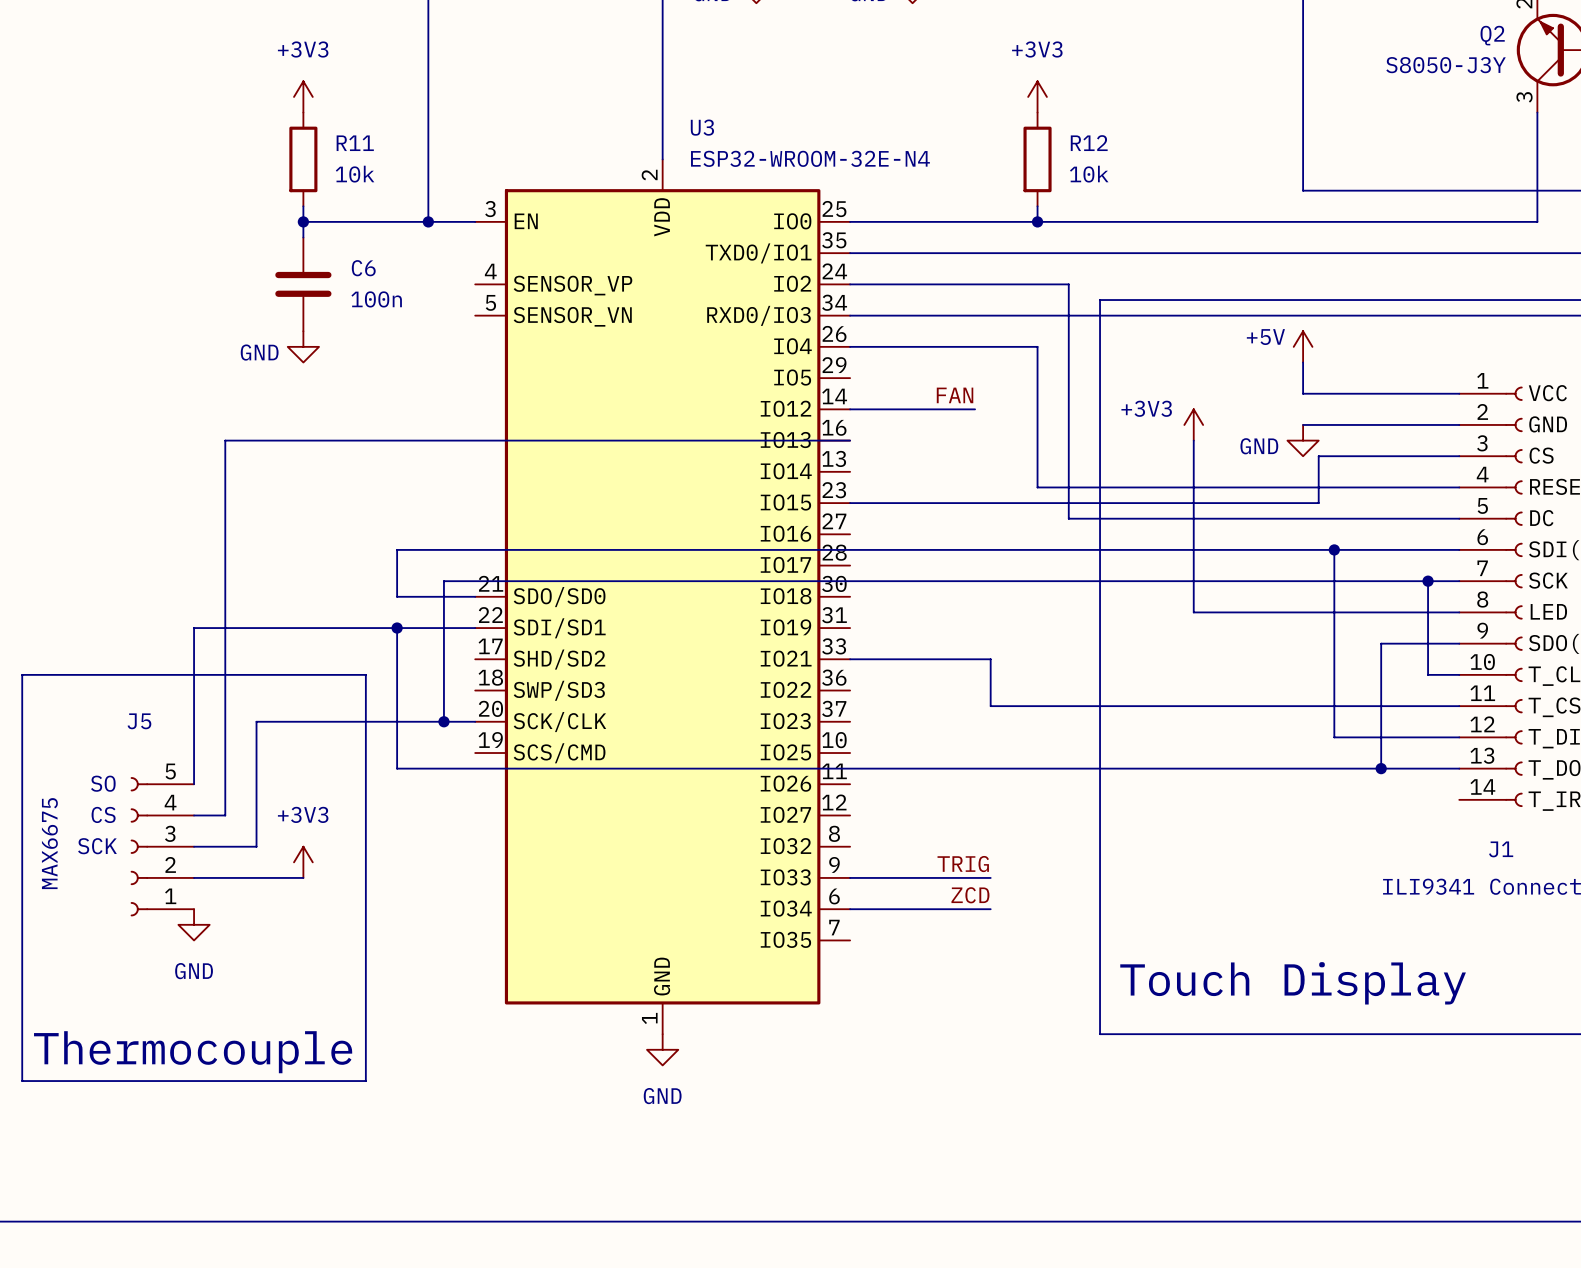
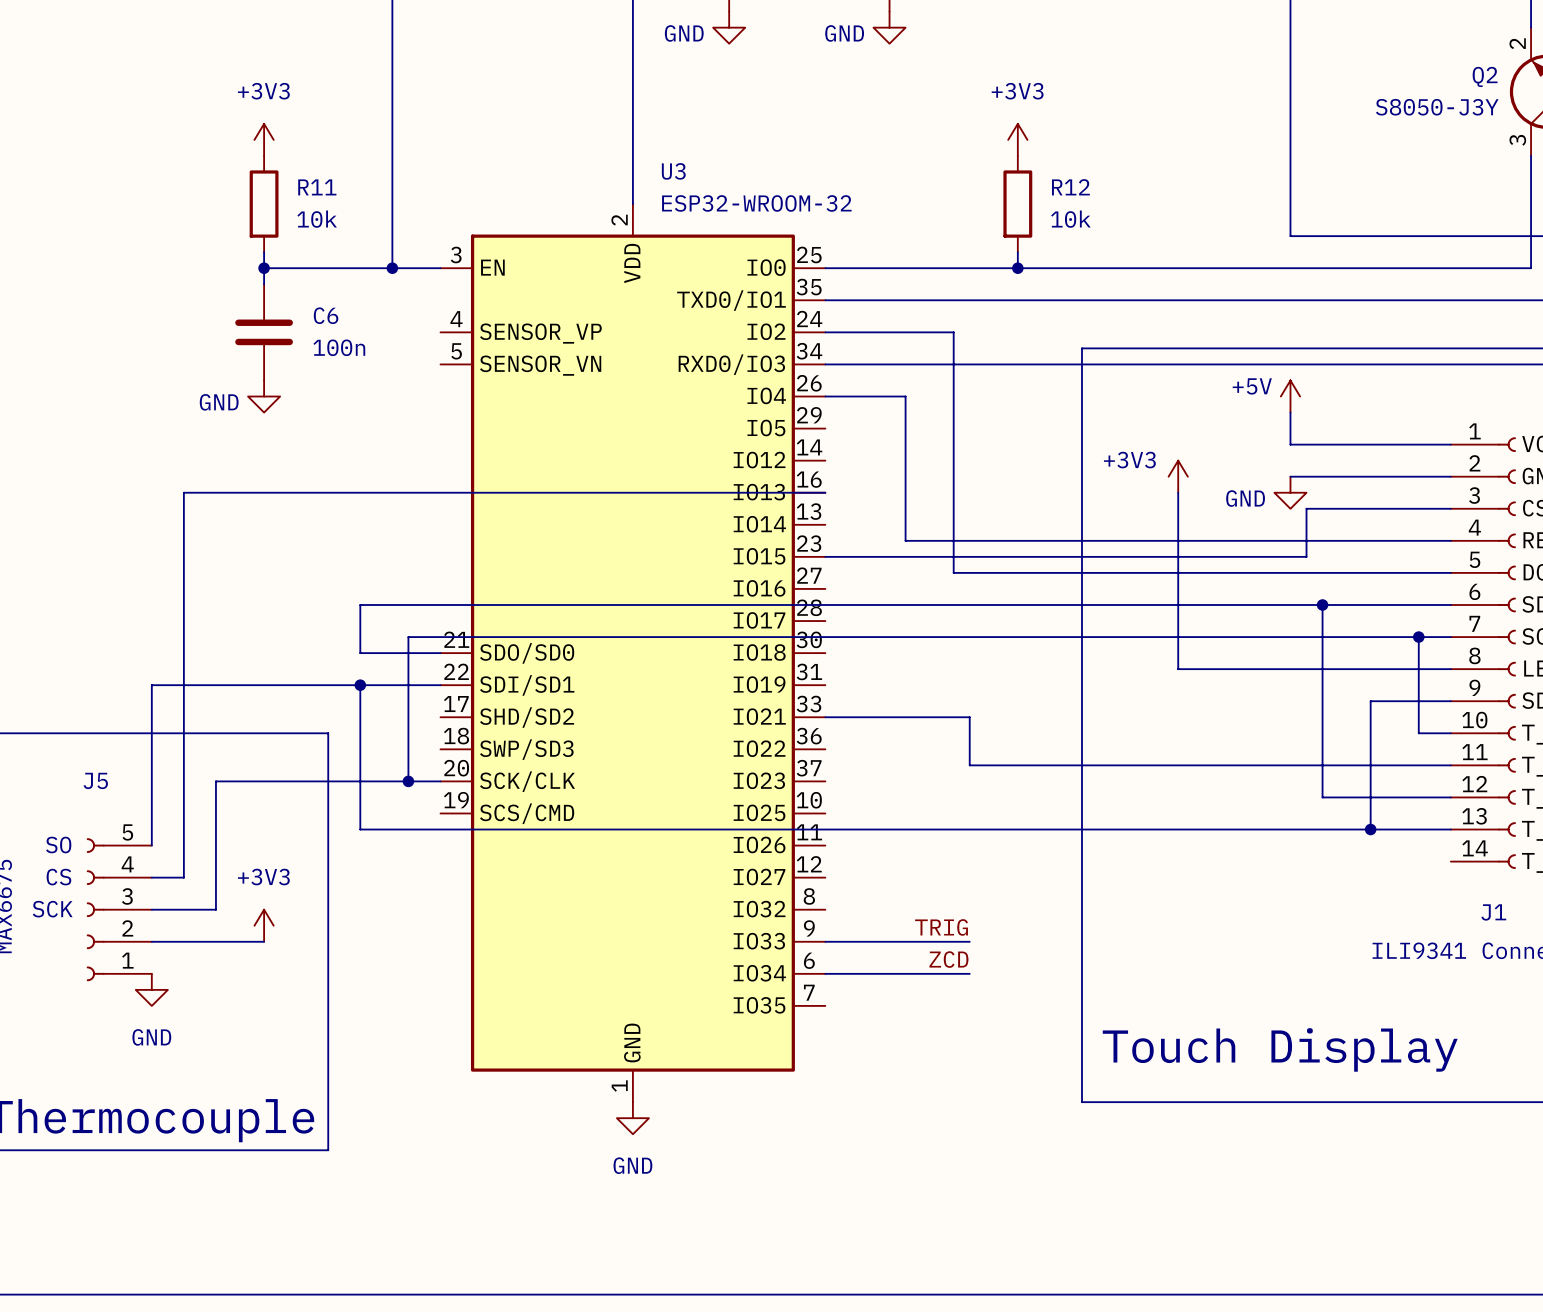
U3 value: ESP32-WROOM-32E-N4 (810, 158) -> ESP32-WROOM-32 (756, 203)
wire: (975, 284) (1068, 284) (1068, 518) -> (953, 332) (953, 572) (1049, 572)
wire: (928, 346) (1037, 346) (1037, 487) -> (905, 396) (905, 540) (1017, 540)
label: FAN (955, 395) -> none
wire: (850, 409) (975, 409) -> none

